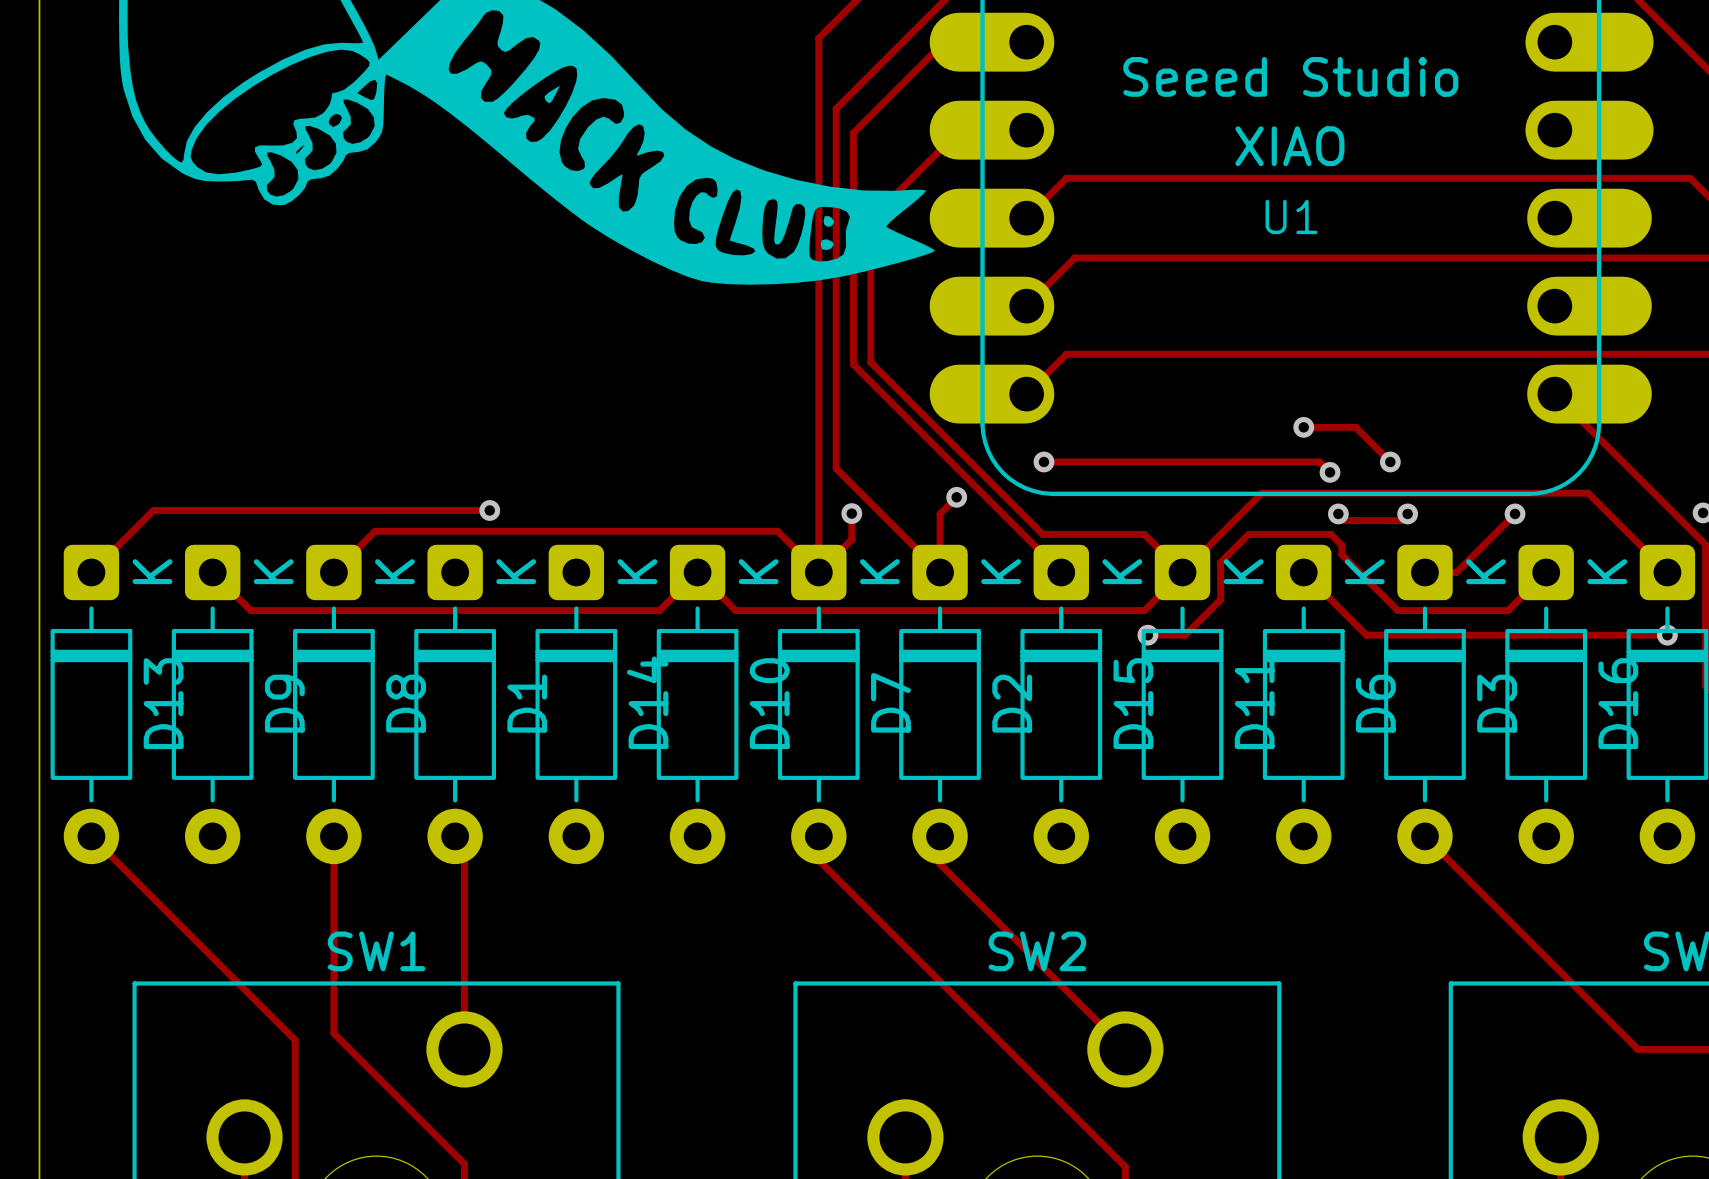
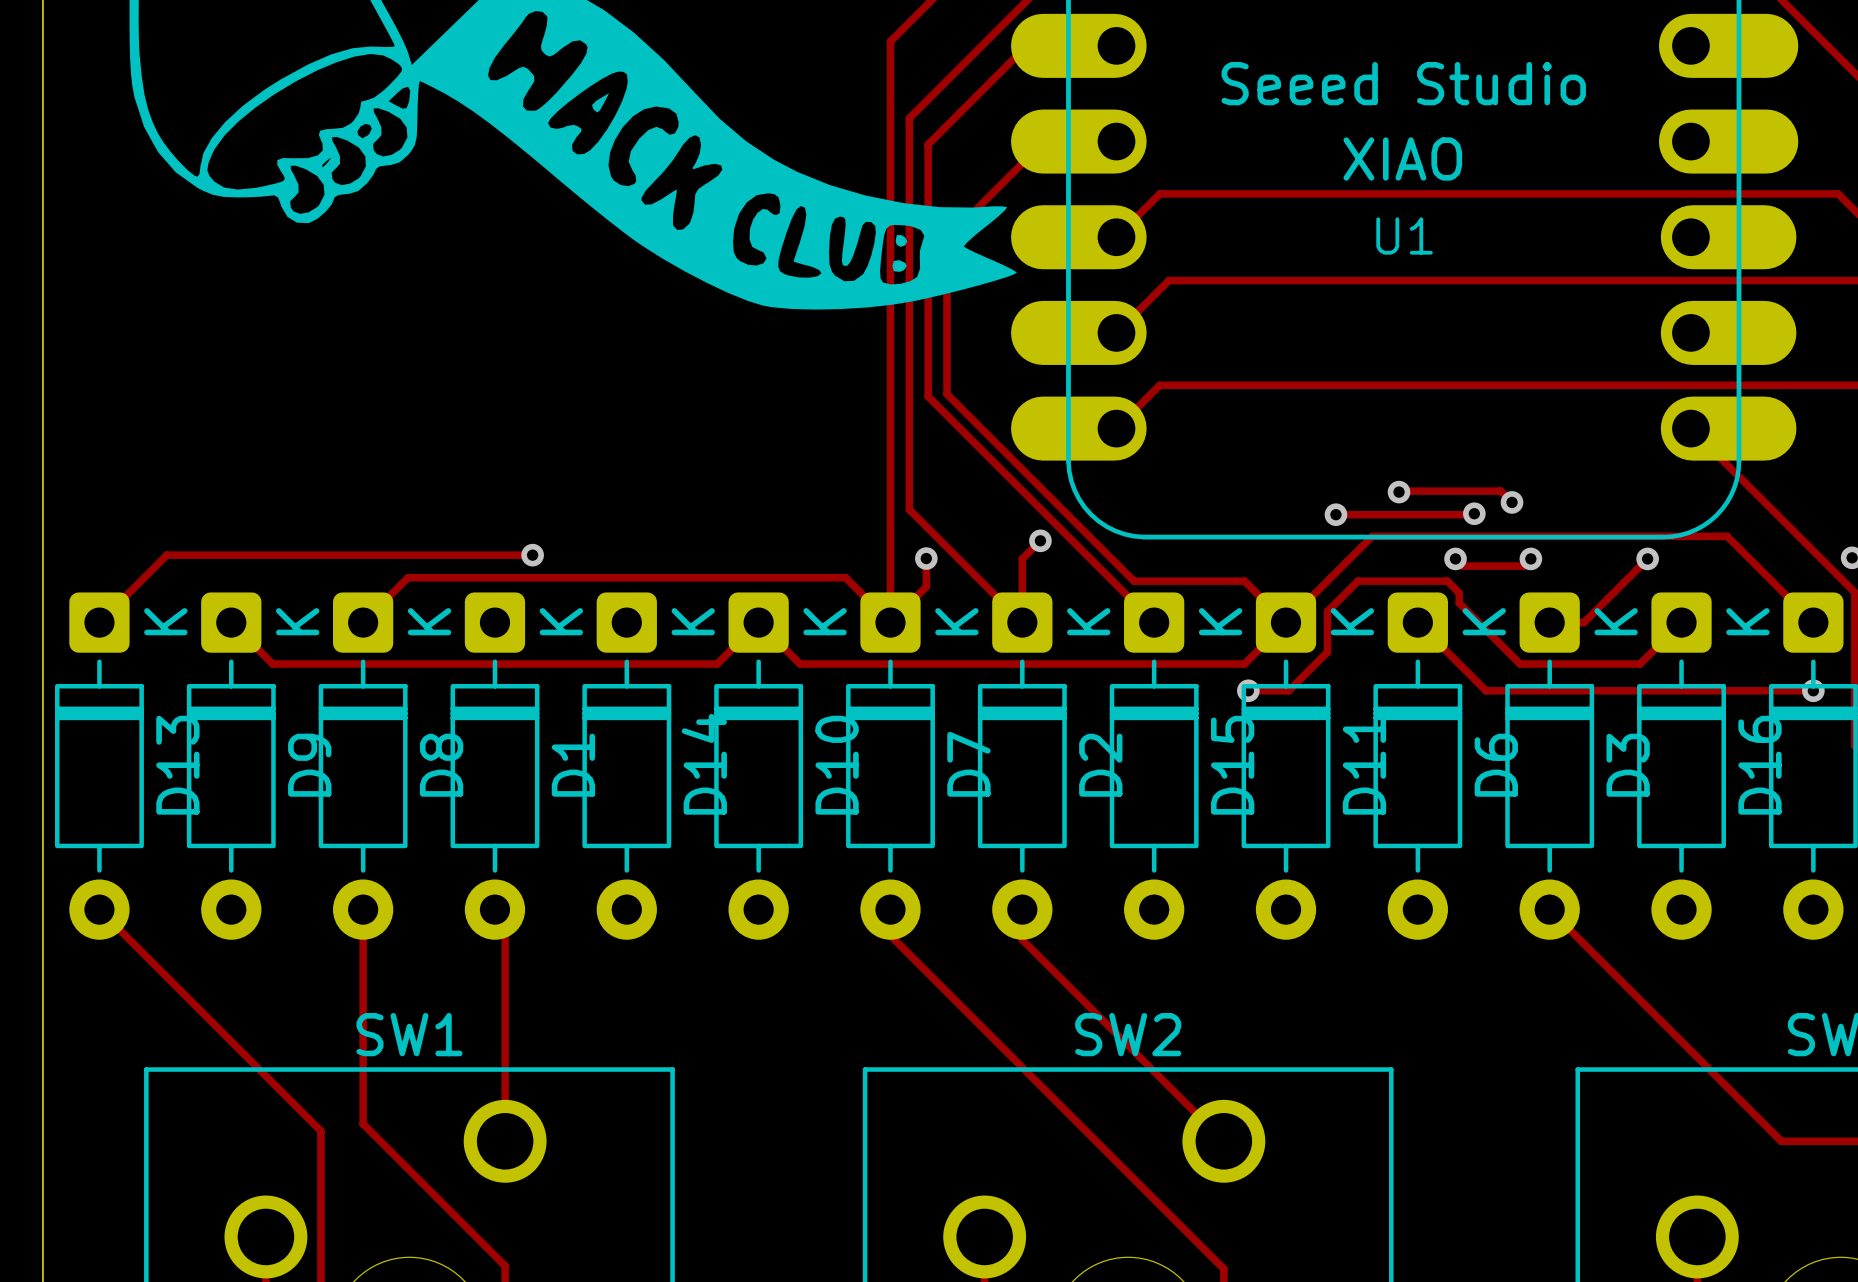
track: (1303, 427) (1355, 427) (1379, 451) -> (1399, 492) (1500, 491)
via: (1303, 427) -> none
via: none -> (1399, 492)
track: (1043, 461) (1319, 461) (1330, 472) -> none
via: (1043, 461) -> none
via: (1330, 472) -> none
track: none -> (1474, 513) (1335, 514)
via: none -> (1474, 513)
via: none -> (1335, 514)

